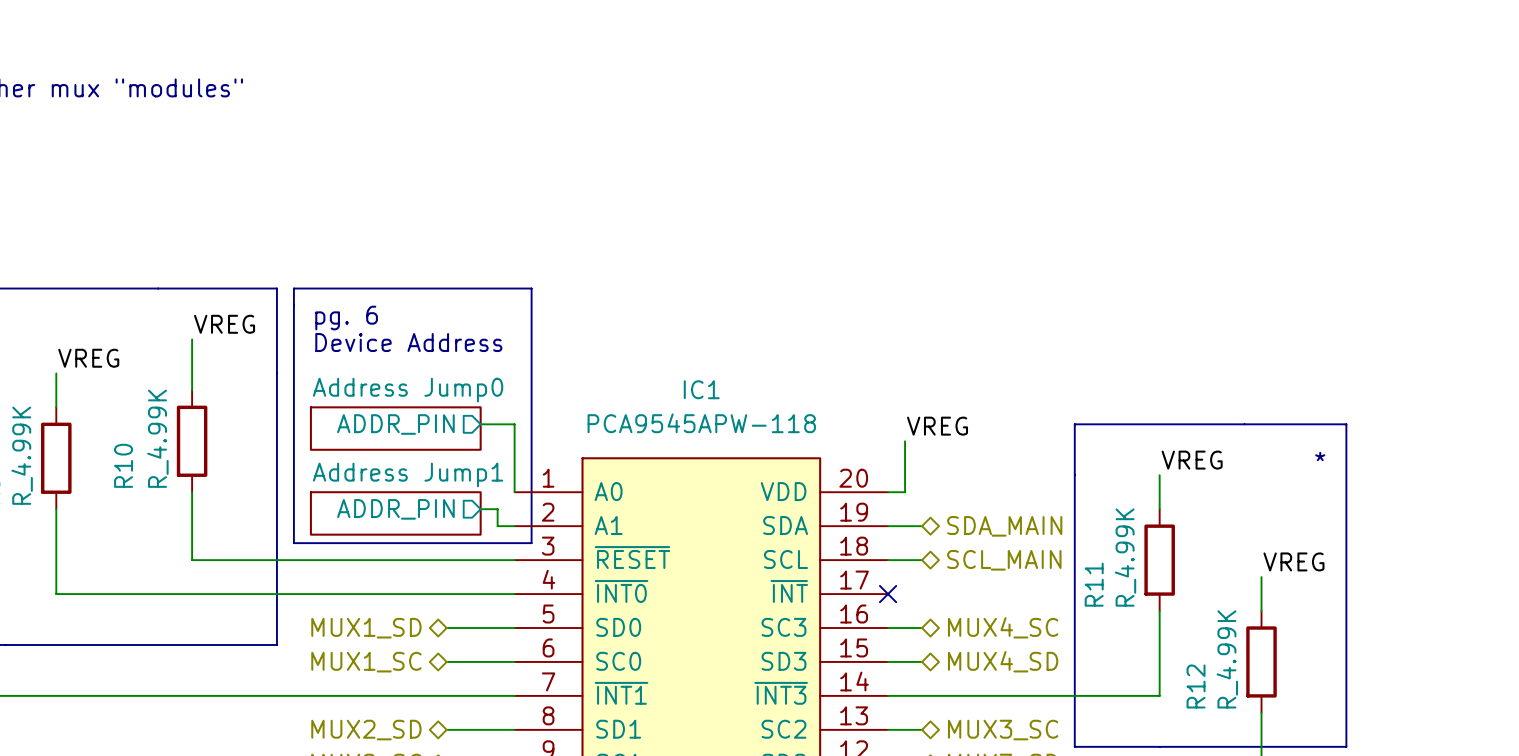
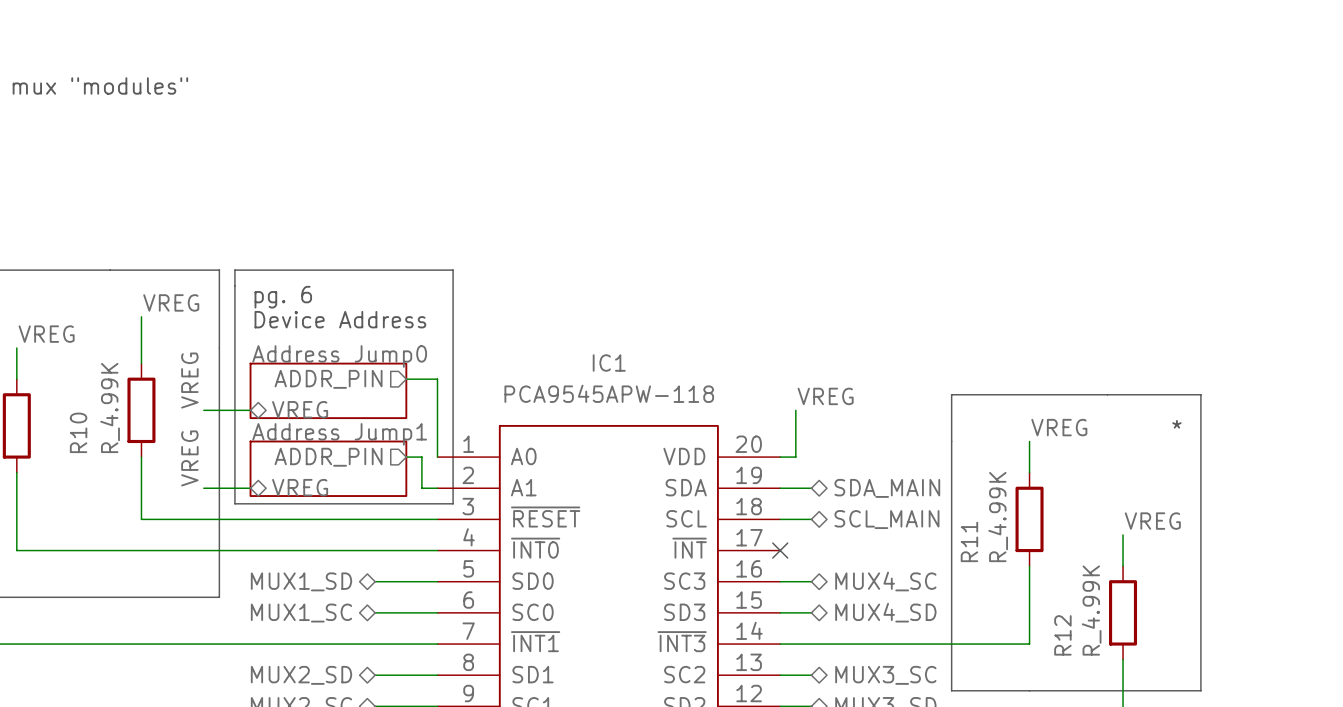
sheet Address Jump0 shape: [309, 406, 482, 451] -> [249, 362, 408, 420]
label: none -> VREG (189, 380)
sheet pin position: ADDR_PIN (395, 424) -> ADDR_PIN (328, 379)
wire: (480, 424) (514, 424) -> (406, 379) (437, 379) (437, 394)
sheet pin: none -> VREG (300, 409)
wire: none -> (203, 410) (250, 410)
sheet Address Jump1 shape: [309, 491, 482, 536] -> [249, 440, 408, 497]
label: none -> VREG (189, 458)
sheet pin position: ADDR_PIN (395, 509) -> ADDR_PIN (328, 457)
wire: (480, 509) (497, 509) -> (406, 457) (421, 457) (421, 472)
sheet pin: none -> VREG (300, 487)
wire: none -> (203, 488) (250, 488)

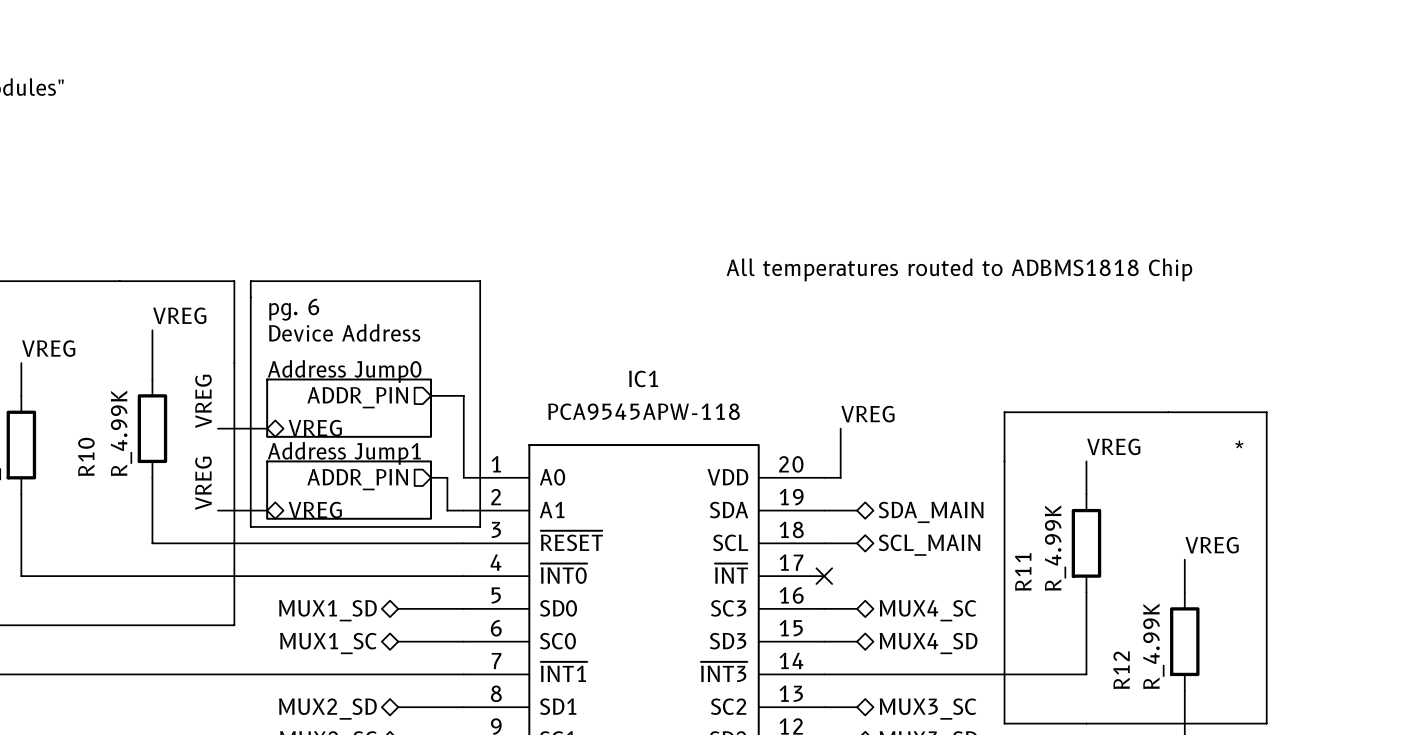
text: none -> All temperatures routed to ADBMS1818 Chip (959, 269)

